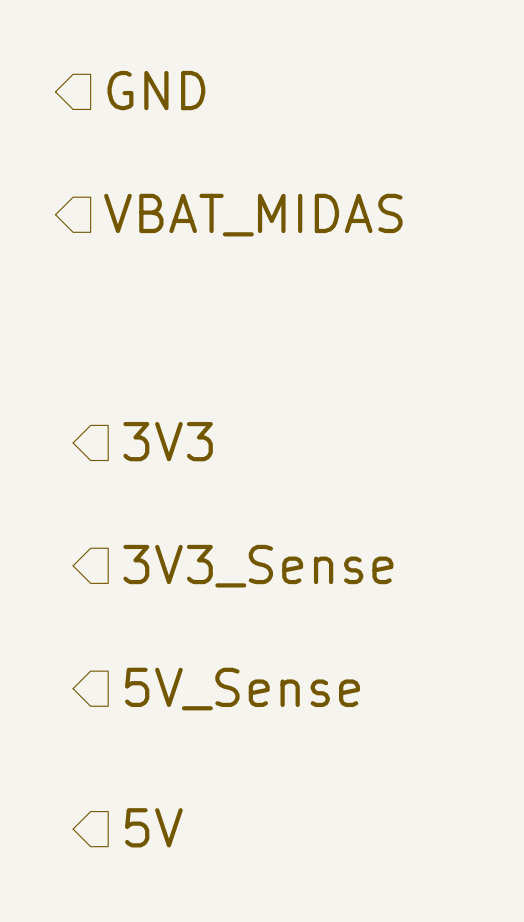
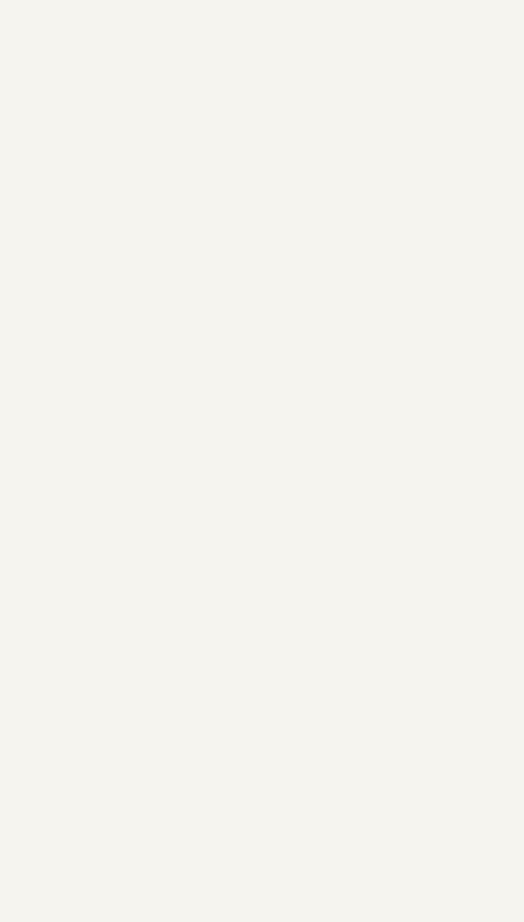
hierarchical label: GND (156, 90) -> none
hierarchical label: VBAT_MIDAS (253, 215) -> none
hierarchical label: 3V3 (168, 441) -> none
hierarchical label: 3V3_Sense (258, 566) -> none
hierarchical label: 5V_Sense (242, 689) -> none
hierarchical label: 5V (153, 827) -> none

